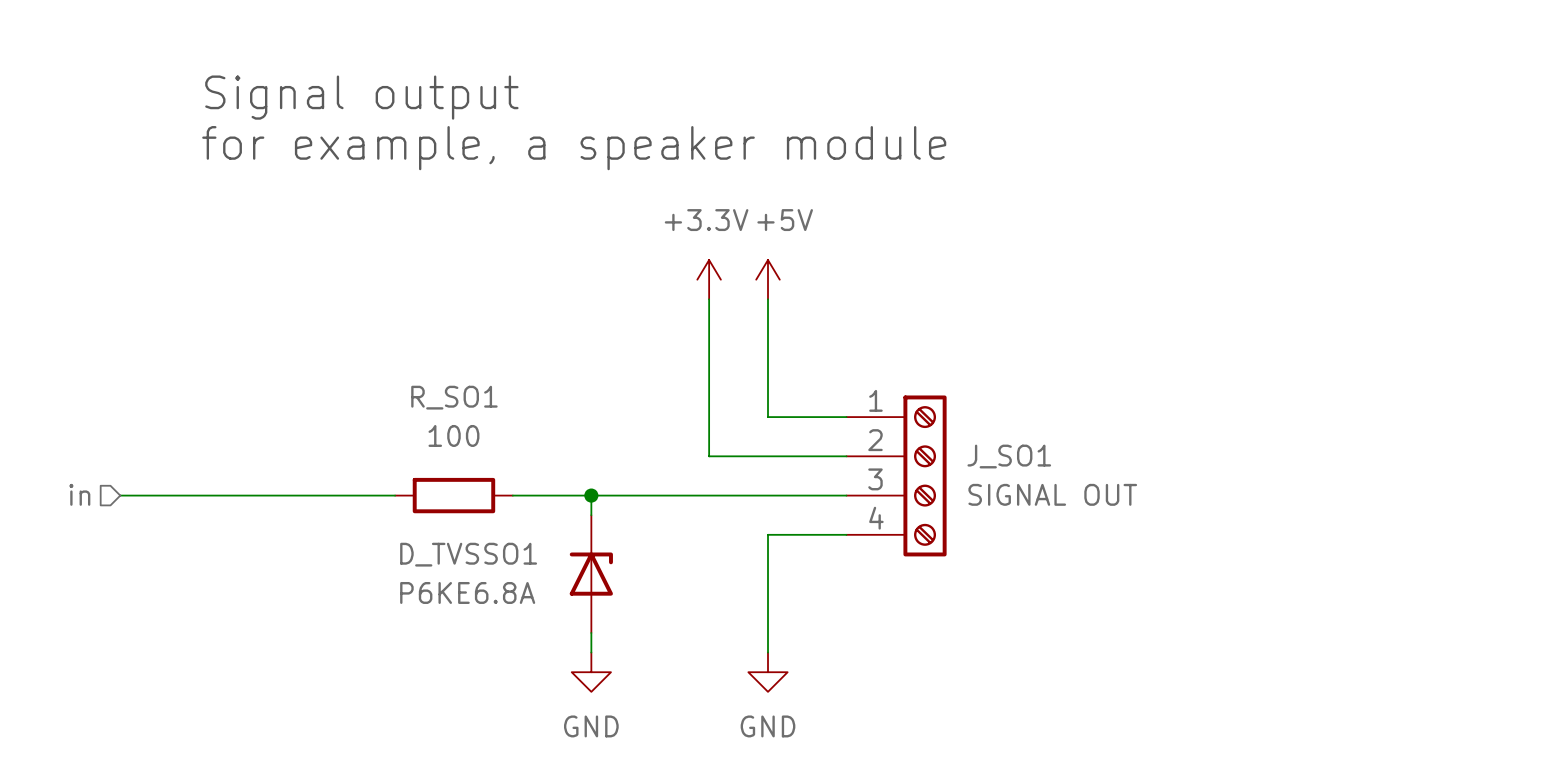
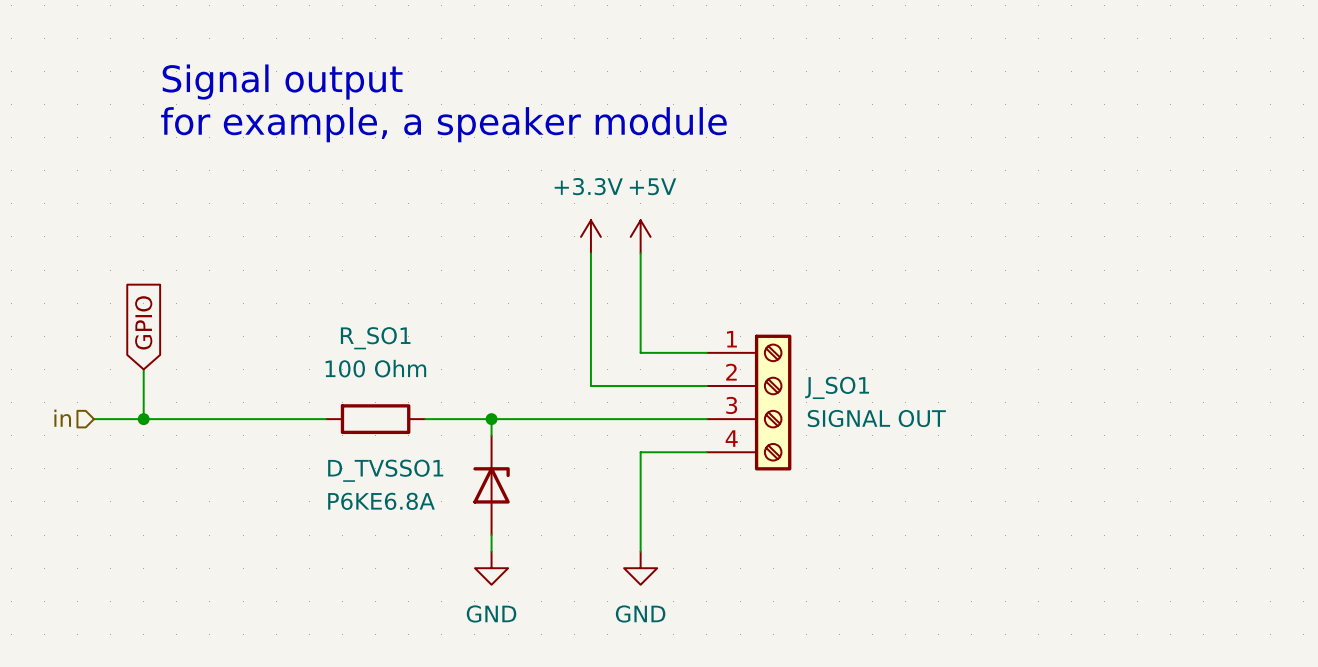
global label: none -> GPIO (143, 322)
R_SO1 value: 100 (453, 435) -> 100 Ohm (375, 368)
wire: none -> (143, 369) (143, 419)
junction: none -> (143, 419)

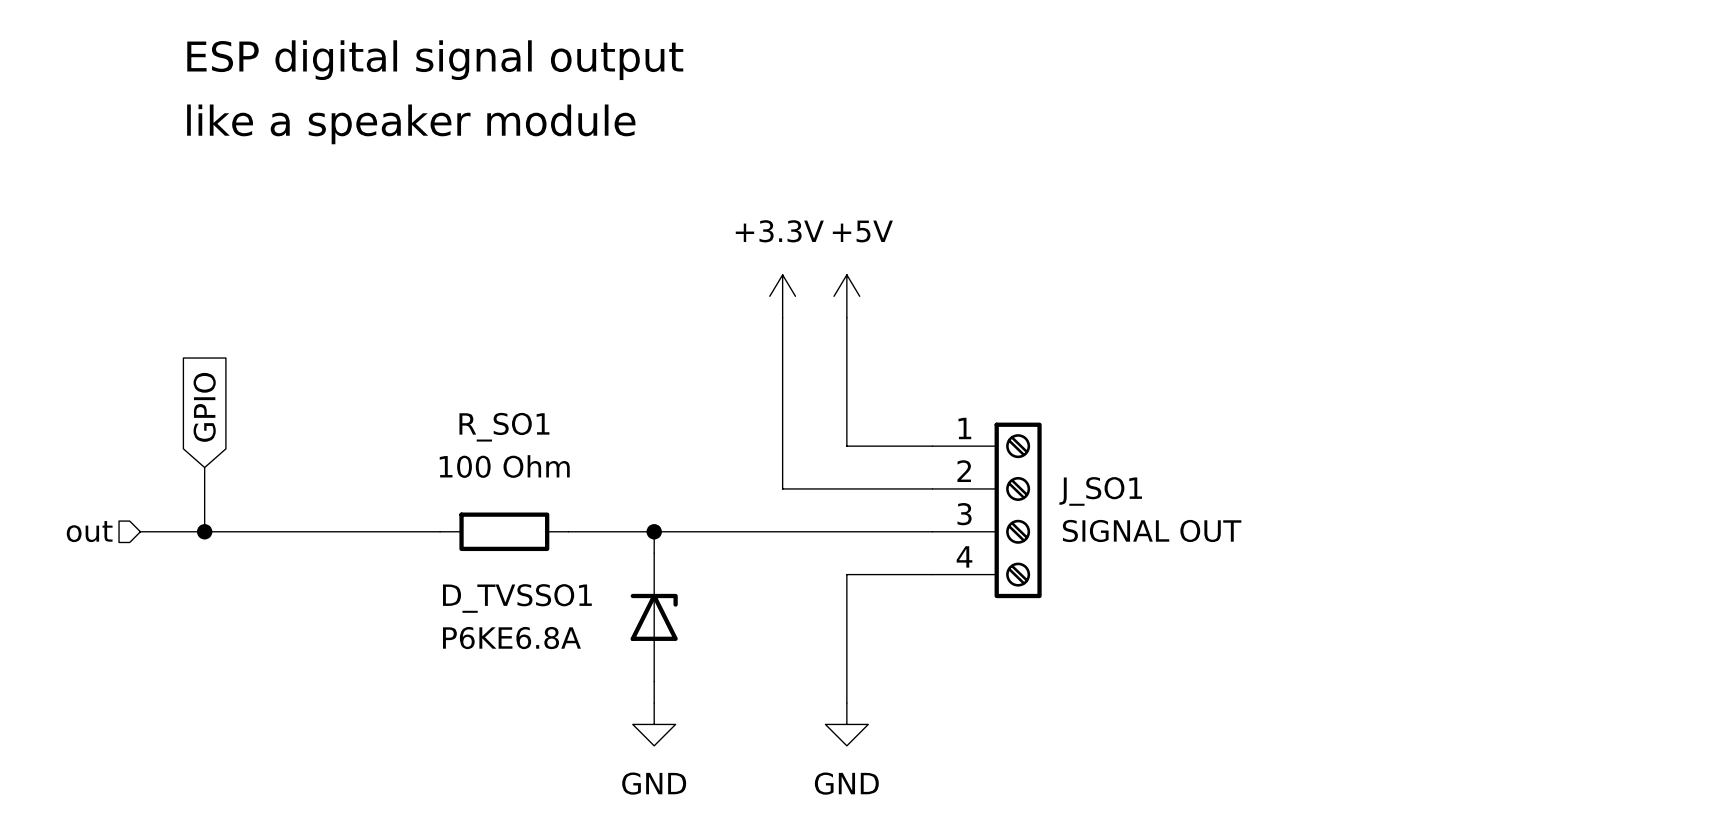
label: none -> ESP digital signal output (435, 60)
text: Signal output (282, 82) -> none
label: none -> like a speaker module (411, 124)
text: for example, a speaker module (443, 124) -> none
hierarchical label: in (62, 418) -> out (89, 531)

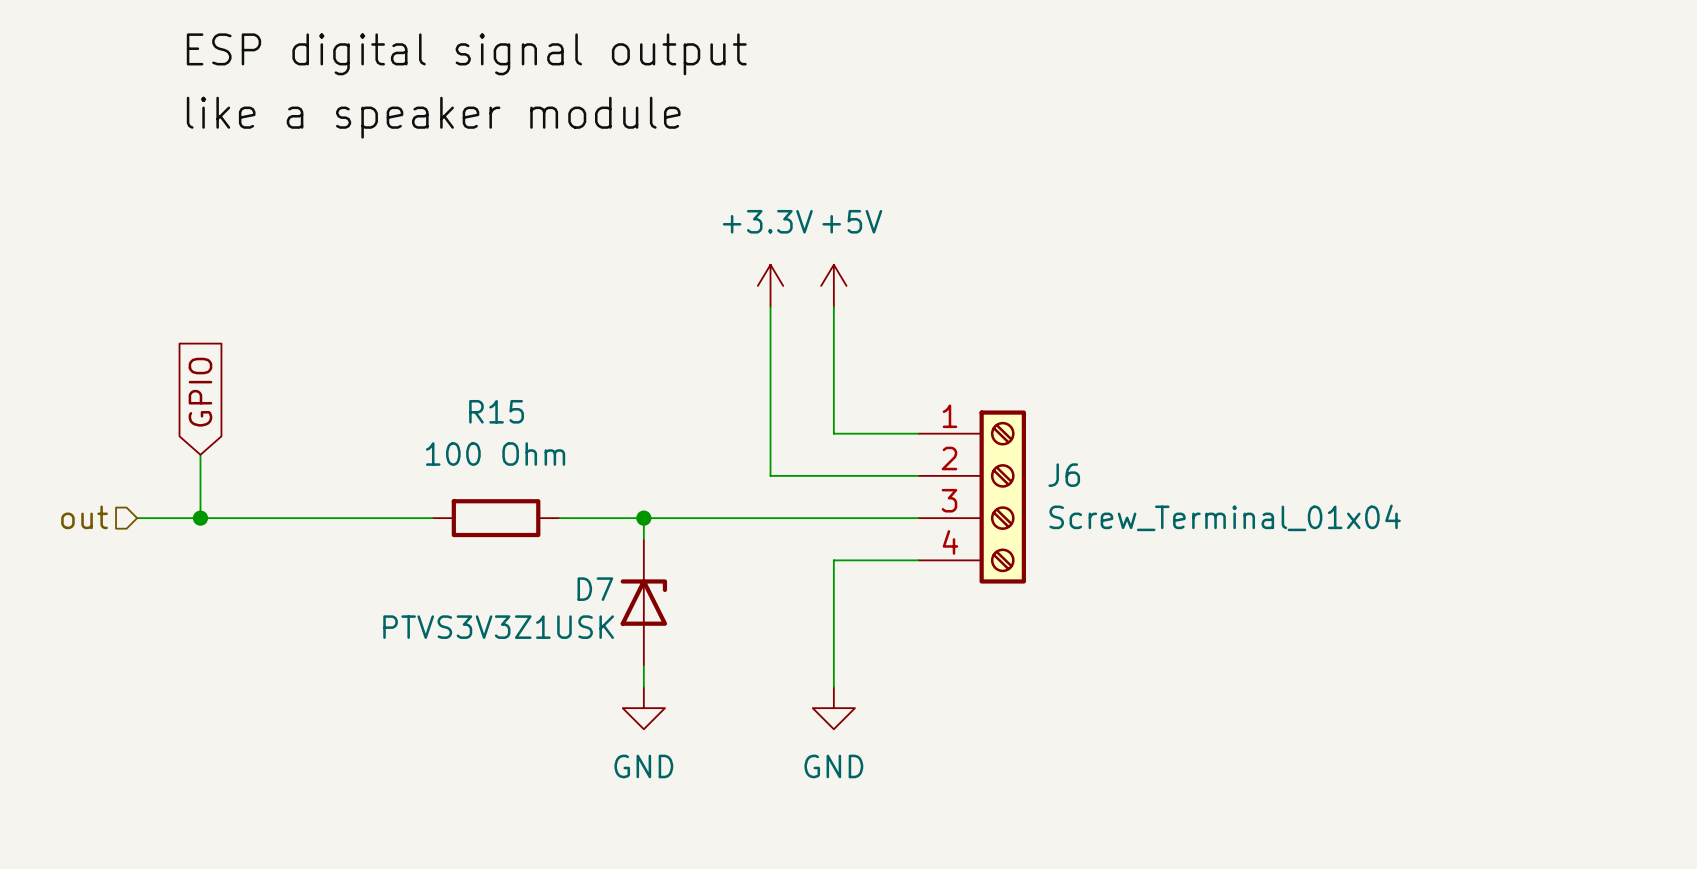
R_SO1 name: R_SO1 (504, 427) -> R15 (496, 411)
J_SO1 name: J_SO1 (1100, 491) -> J6 (1064, 475)
J_SO1 value: SIGNAL OUT (1152, 530) -> Screw_Terminal_01x04 (1225, 517)
D_TVSSO1 name: D_TVSSO1 (517, 598) -> D7 (595, 589)
D_TVSSO1 value: P6KE6.8A (511, 638) -> PTVS3V3Z1USK (498, 627)

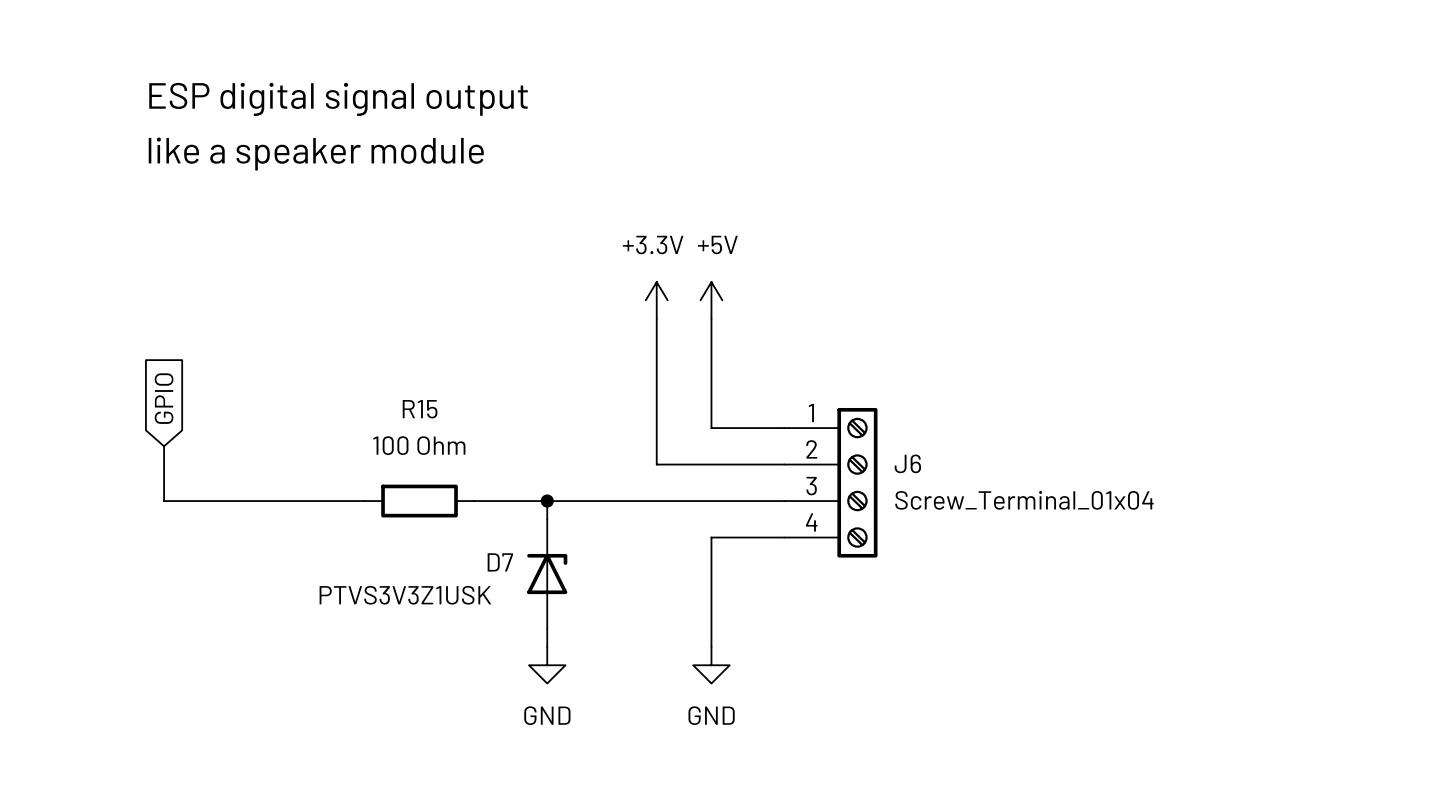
hierarchical label: out (84, 517) -> none
wire: (137, 518) (200, 518) -> none
junction: (200, 518) -> none

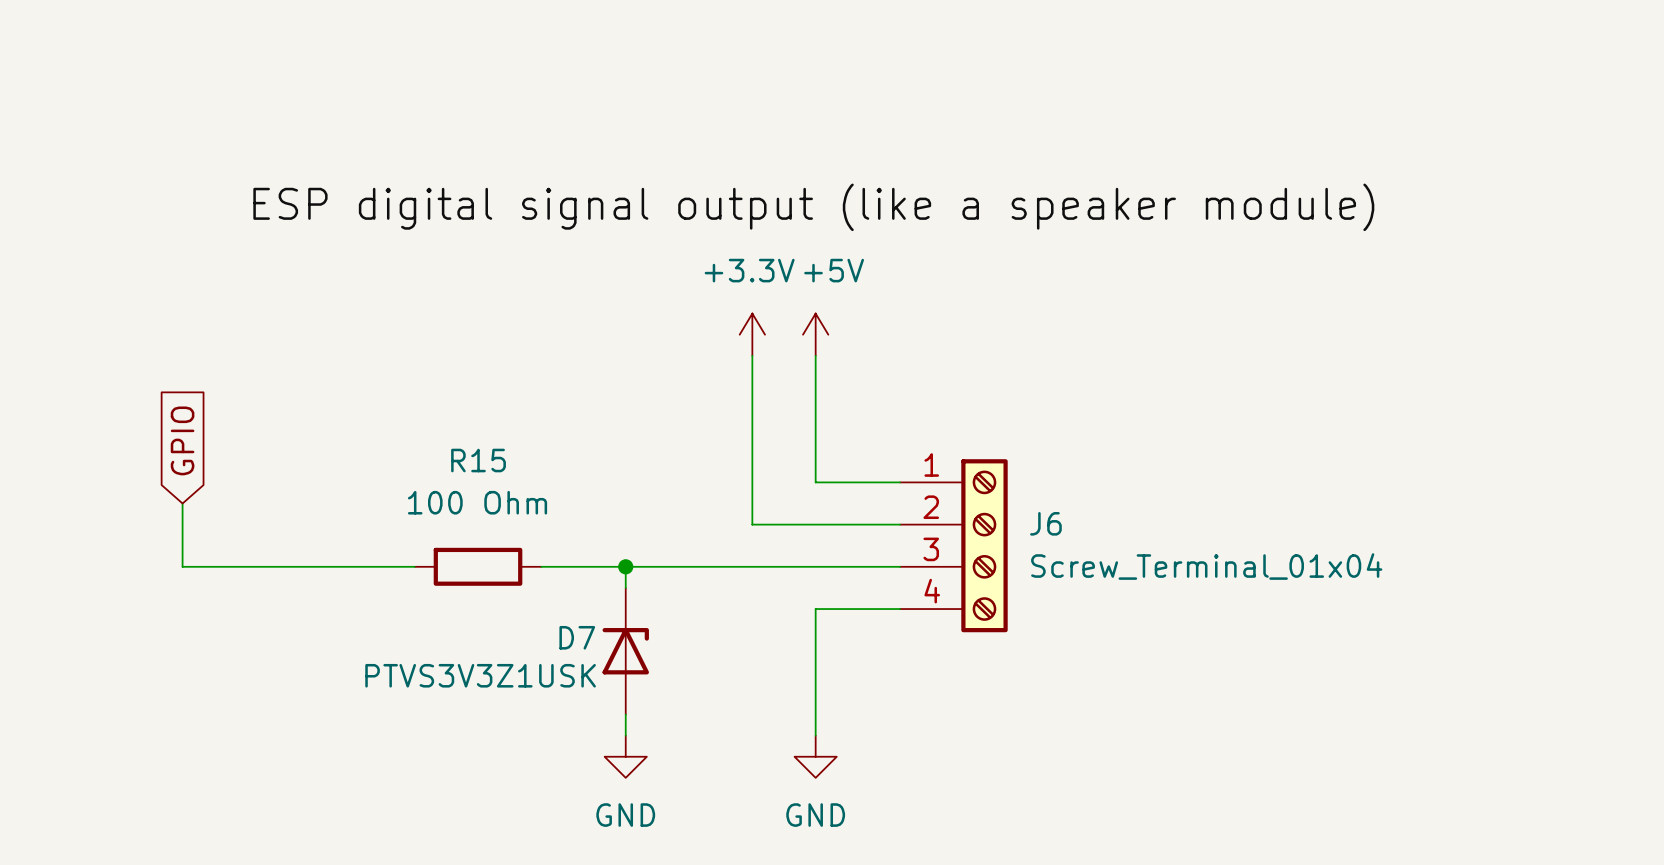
label: ESP digital signal output (338, 99) -> none
label: like a speaker module (316, 154) -> none
label: none -> ESP digital signal output (like a speaker module) (813, 207)

